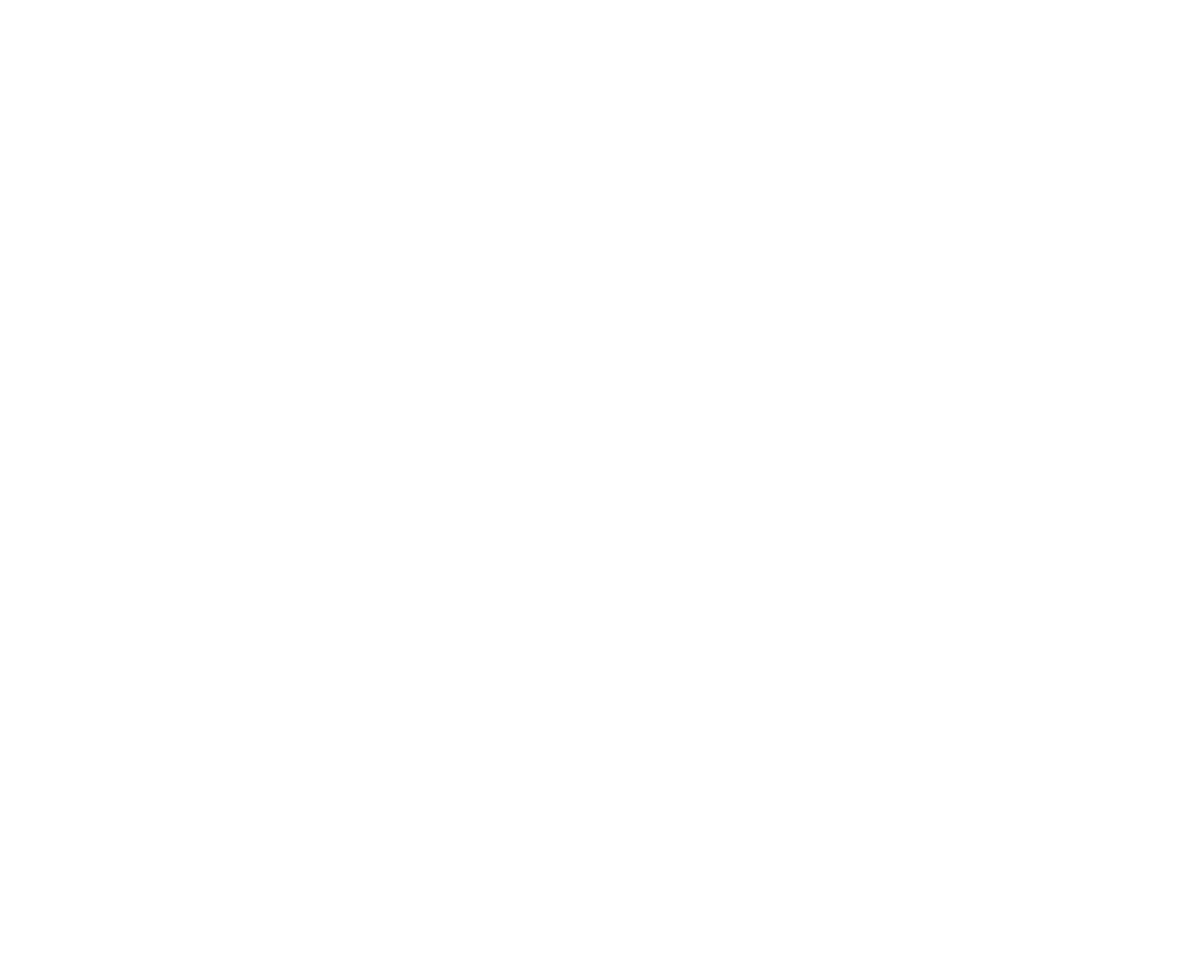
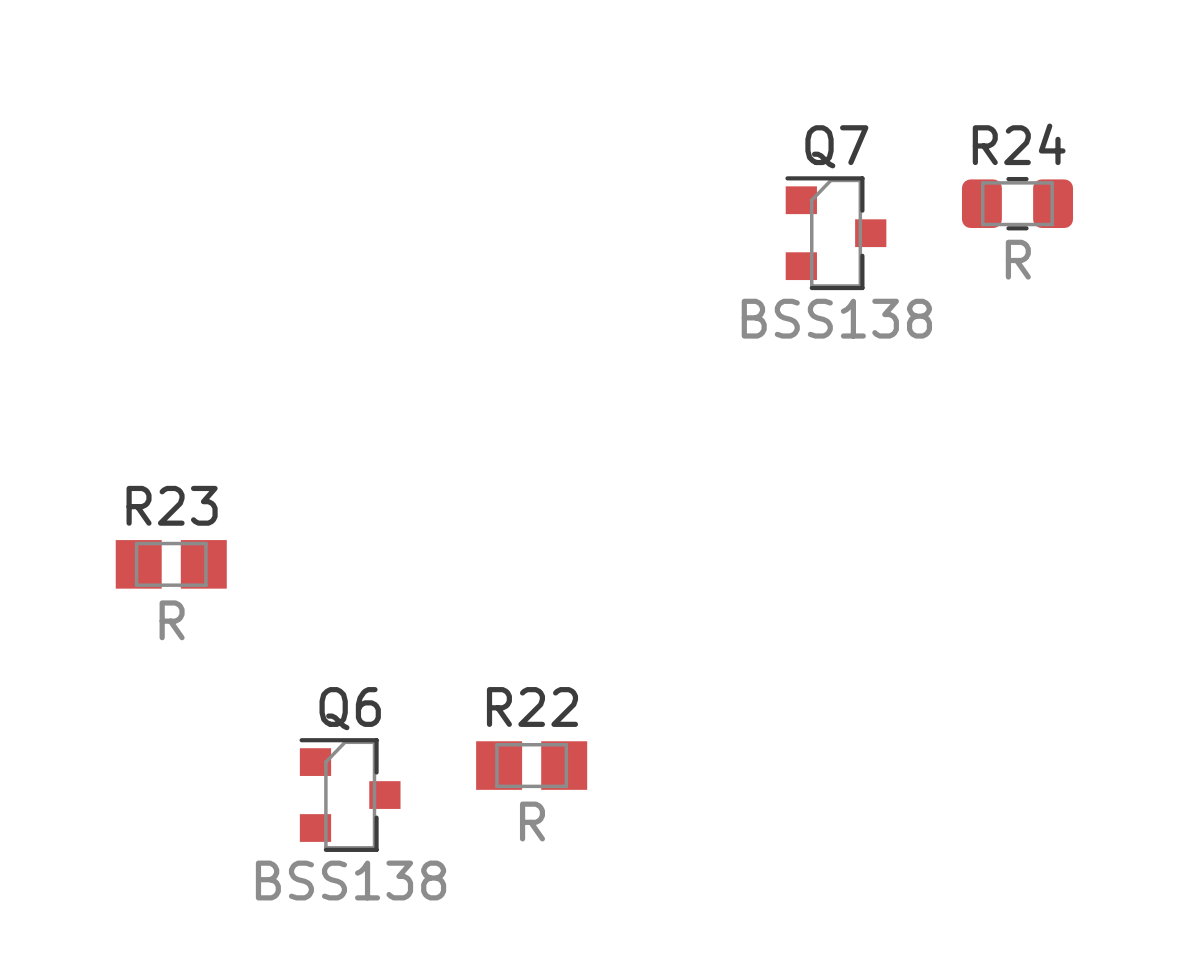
R24: none -> R (1017, 203)
Q7: none -> BSS138 (835, 233)
R23: none -> R (171, 564)
R22: none -> R (531, 765)
Q6: none -> BSS138 (350, 795)

